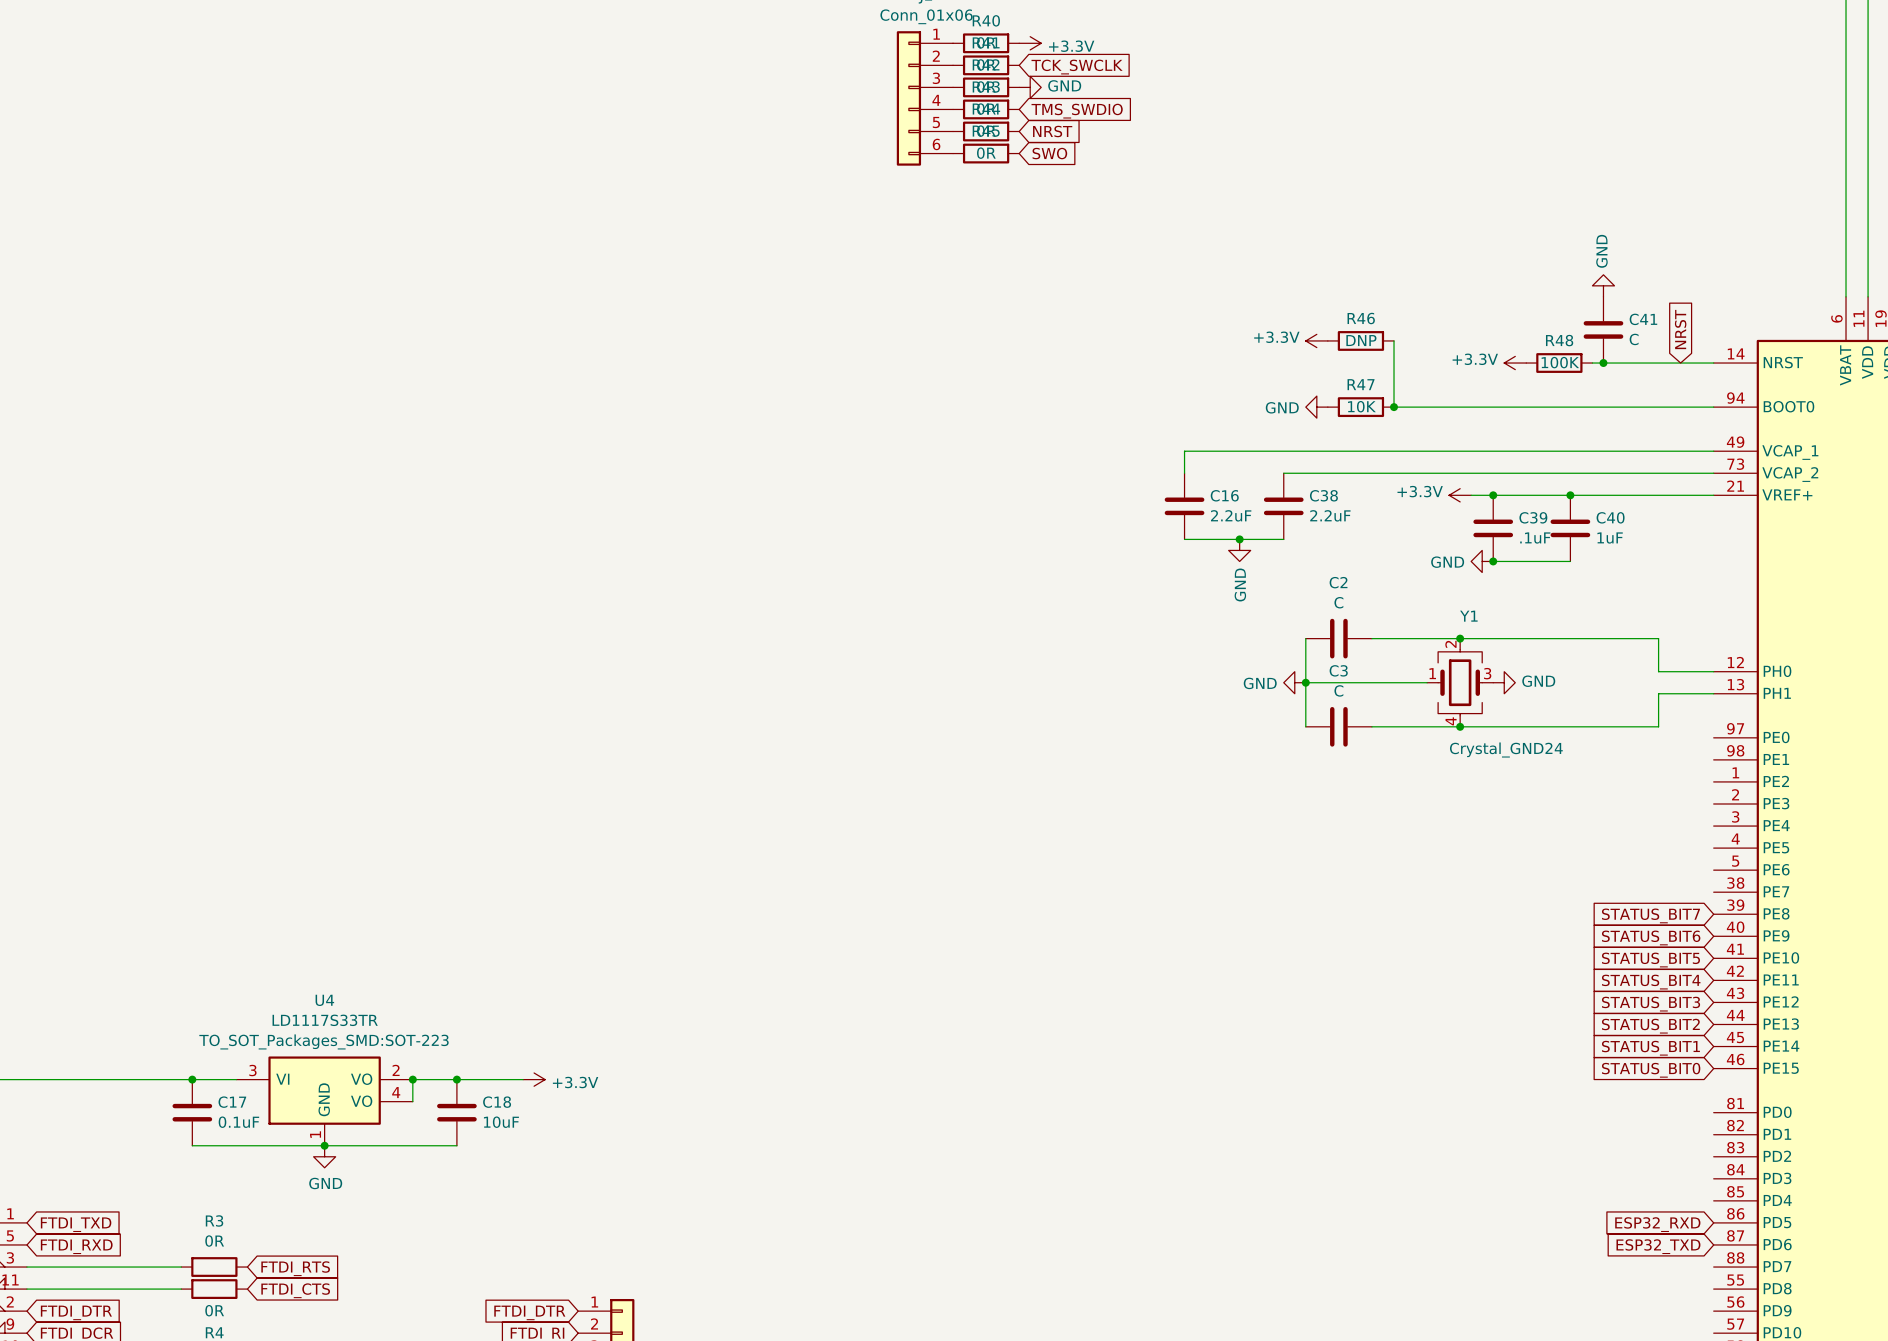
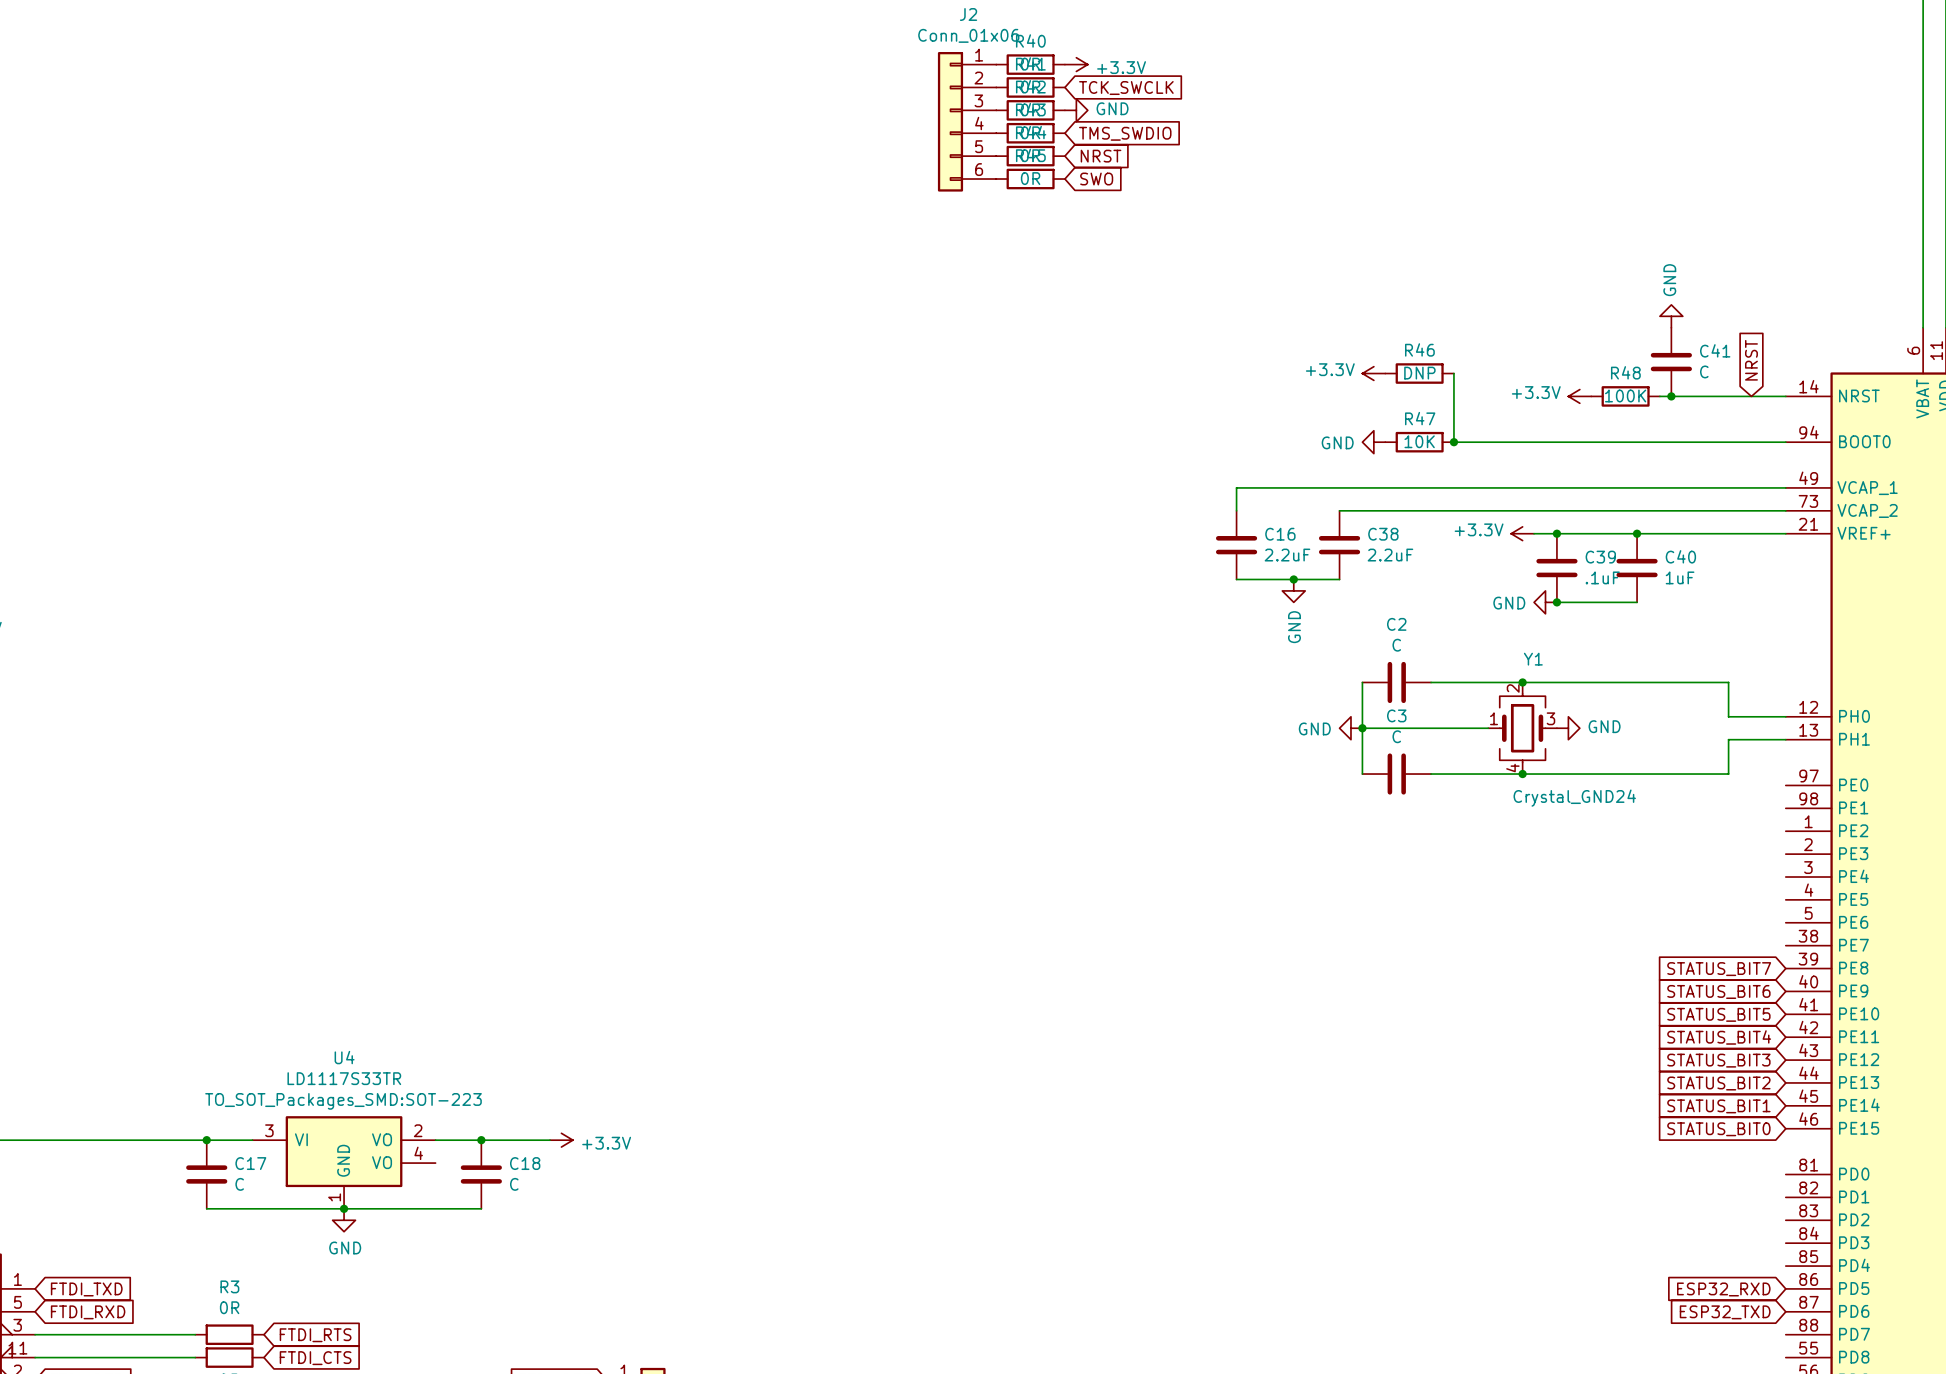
wire: (412, 1079) (412, 1101) -> none
junction: (412, 1079) -> none
C17 value: 0.1uF (238, 1122) -> C (239, 1184)
C18 value: 10uF (501, 1122) -> C (514, 1184)

